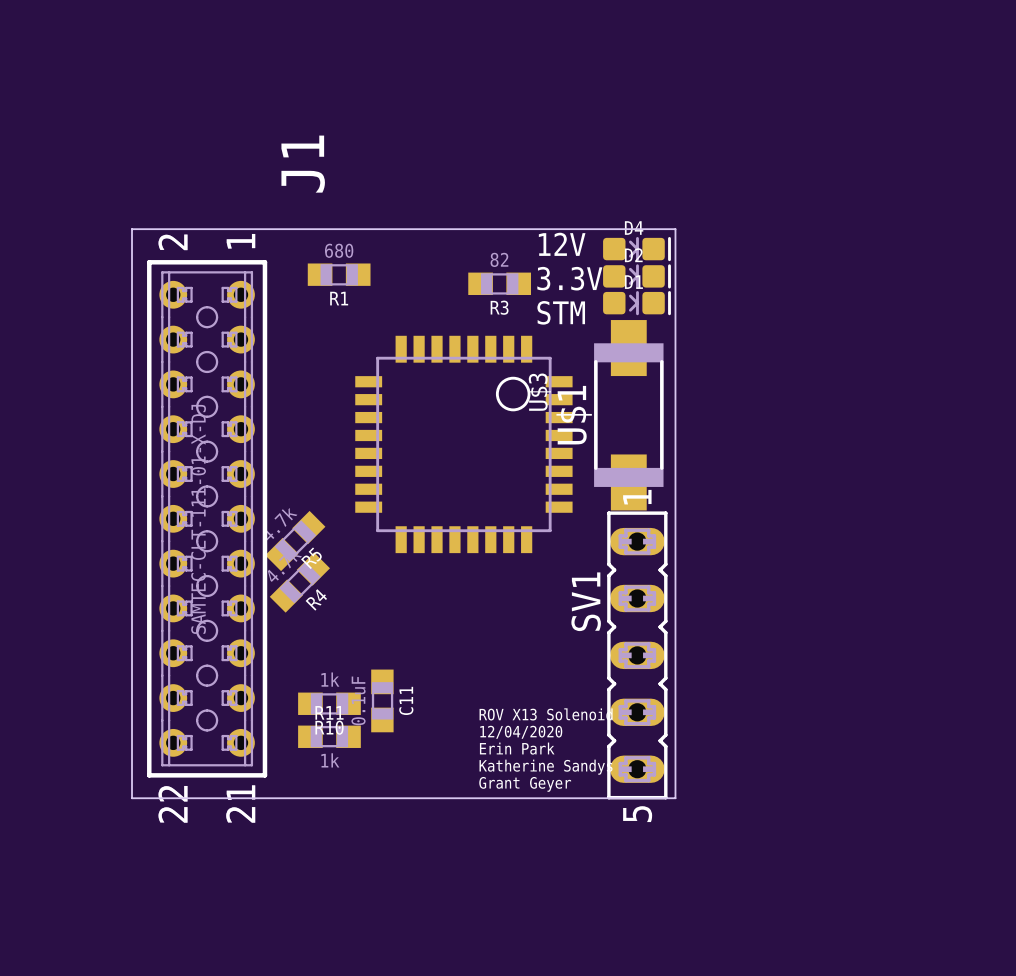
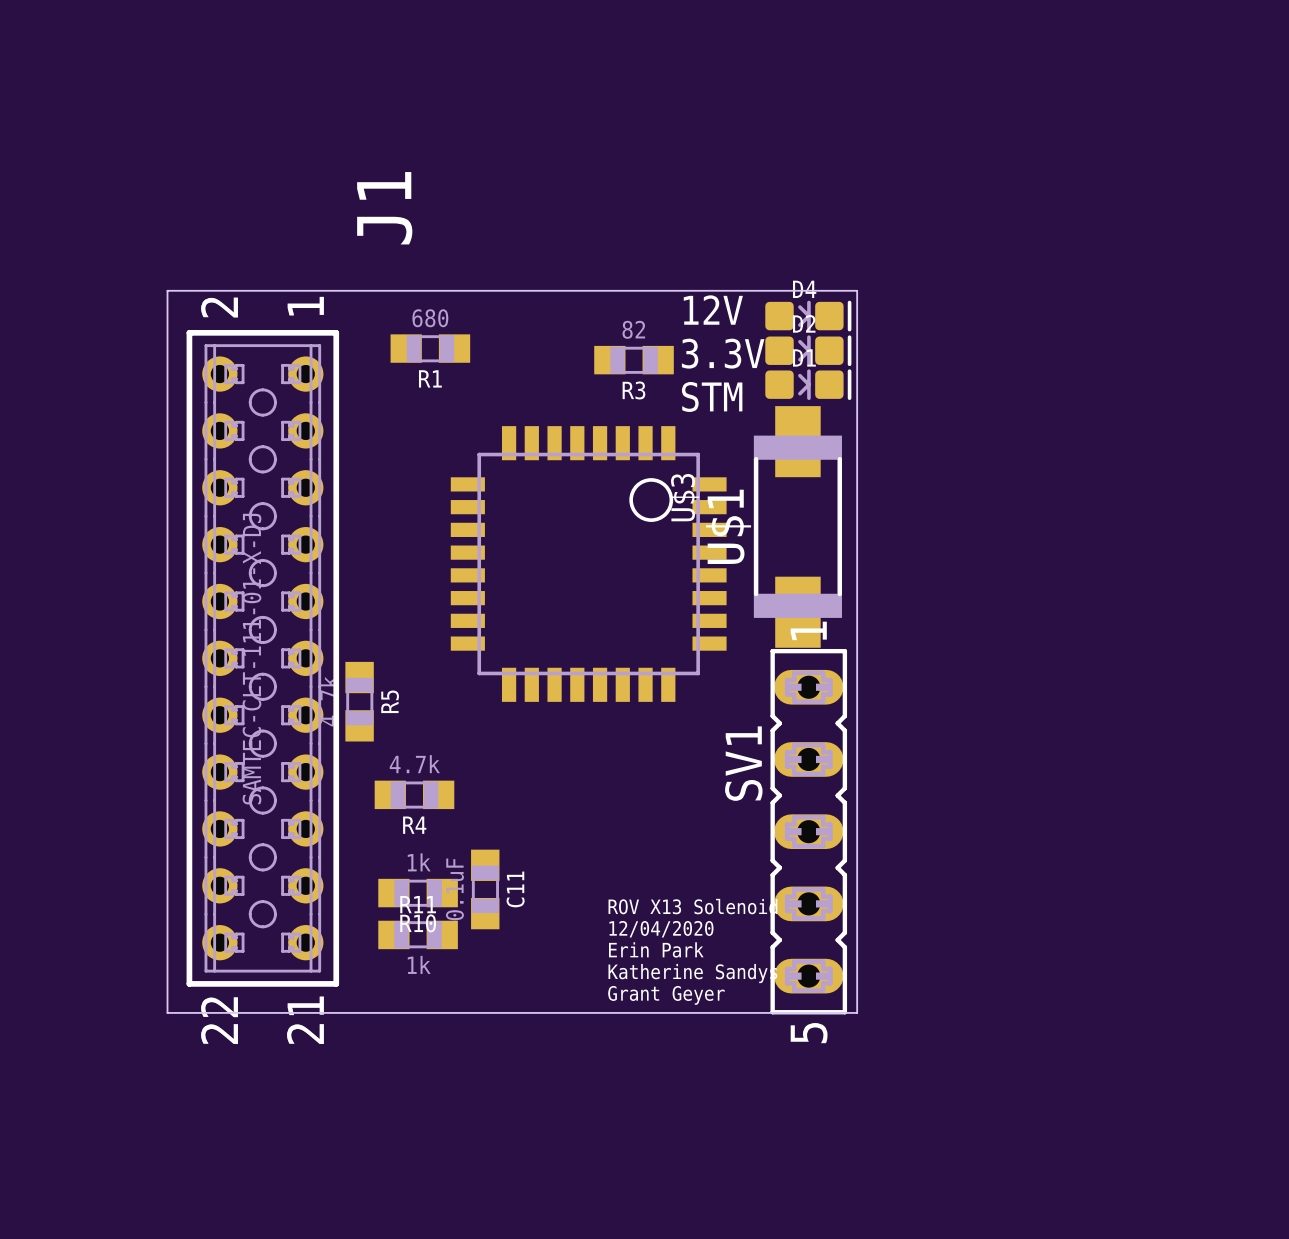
R5 rotation: 0° (295, 541) -> 45° counterclockwise (359, 701)
R4 rotation: 0° (299, 582) -> 45° clockwise (414, 794)
R4 position: (299, 582) -> (414, 794)

